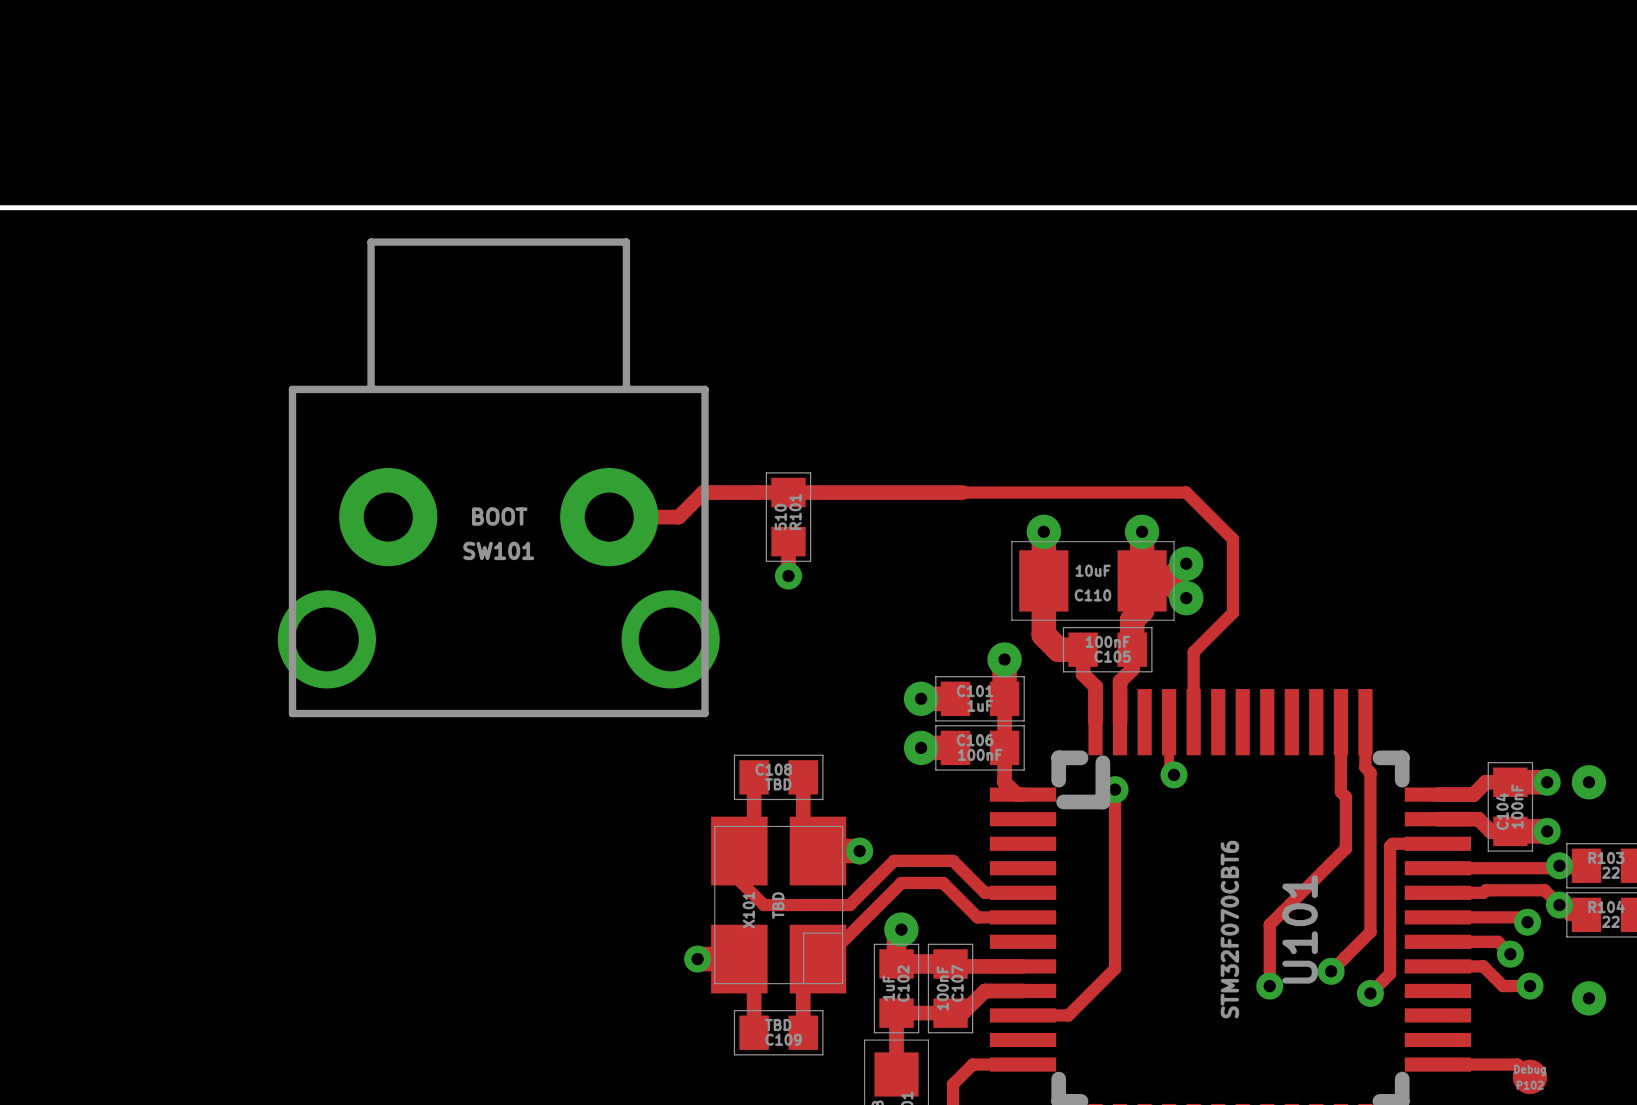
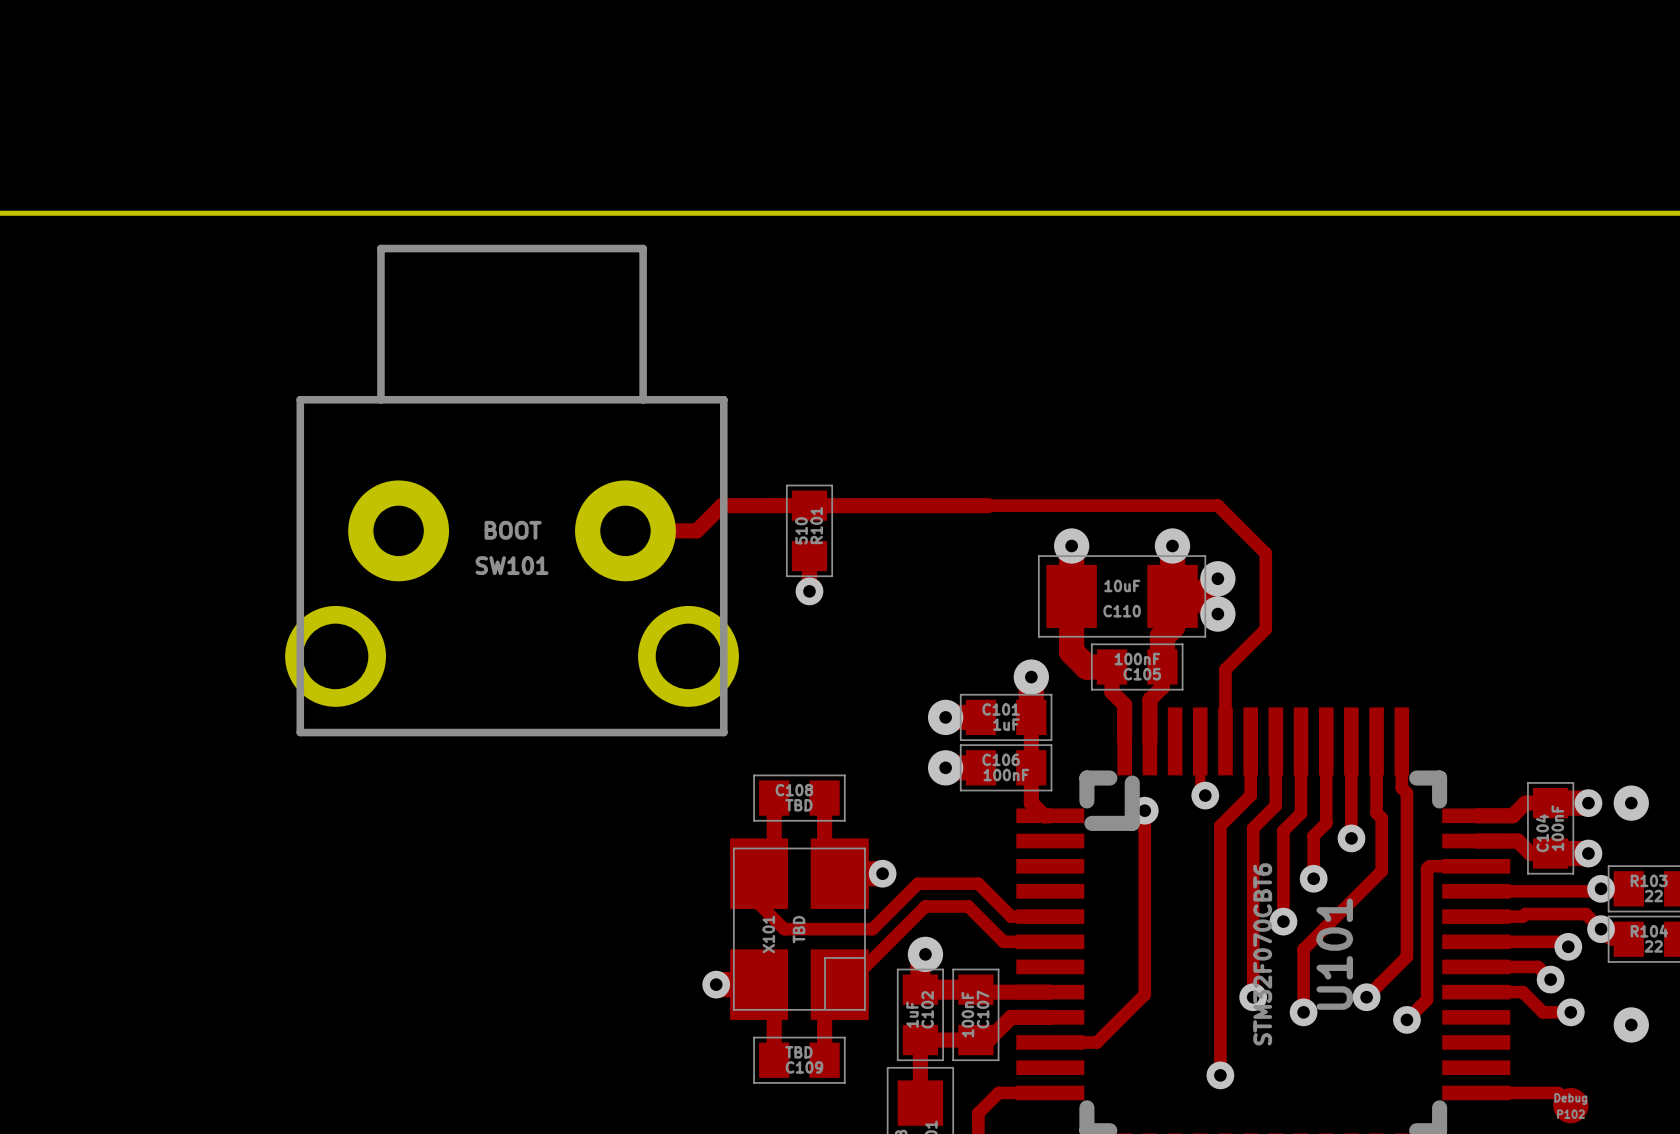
track: none -> (1250, 741) (1250, 795) (1220, 825) (1220, 1075)
track: none -> (1275, 741) (1275, 805) (1253, 828) (1253, 997)
track: none -> (1301, 741) (1301, 813) (1283, 830) (1283, 921)
track: none -> (1326, 741) (1326, 823) (1313, 835) (1313, 878)
track: none -> (1351, 741) (1351, 838)
via: none -> (1351, 838)
via: none -> (1313, 878)
via: none -> (1283, 921)
via: none -> (1253, 997)
via: none -> (1220, 1075)

